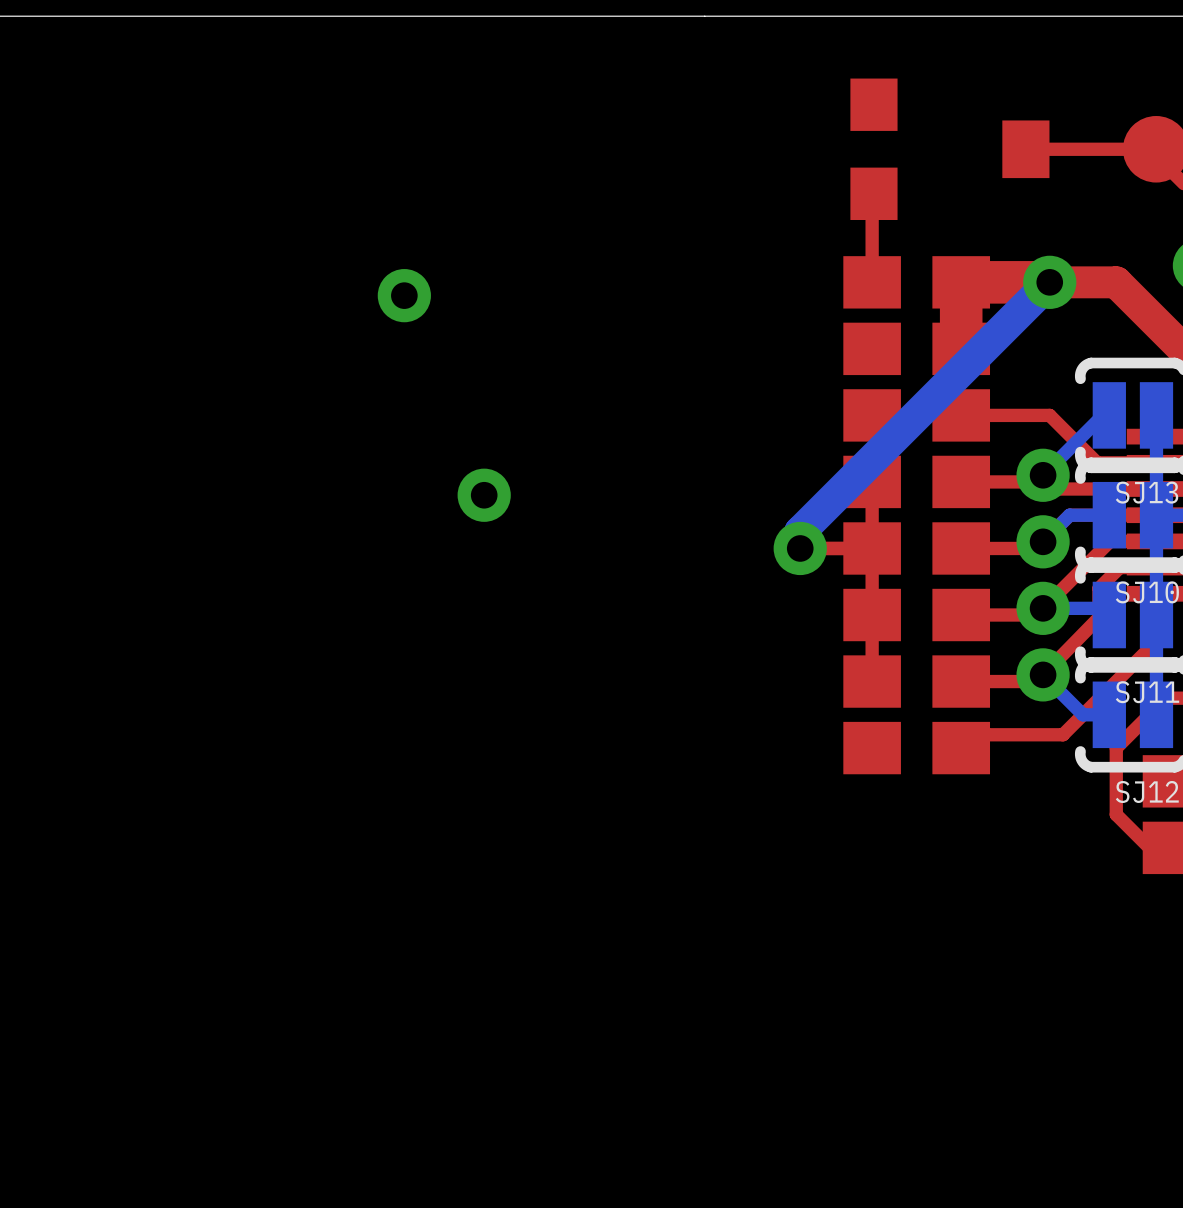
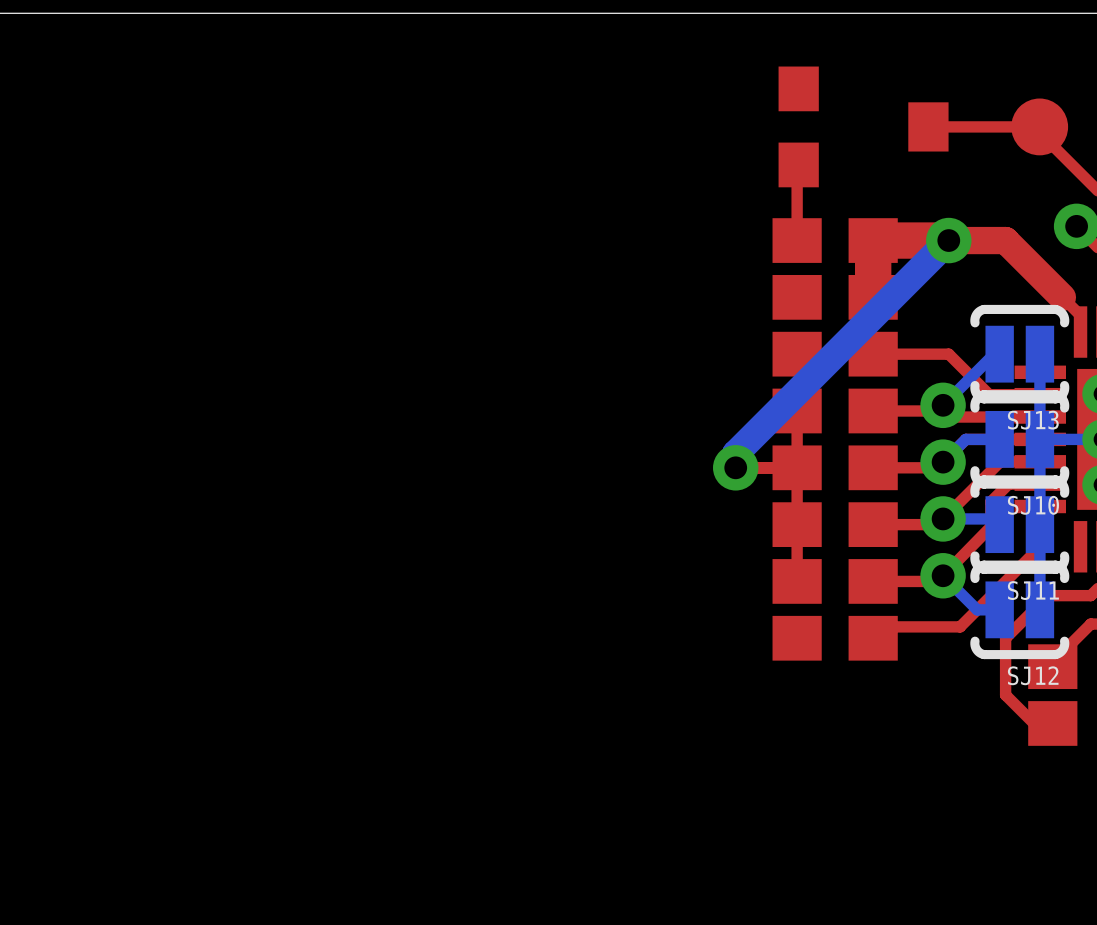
via: (404, 295) -> none
via: (484, 495) -> none

